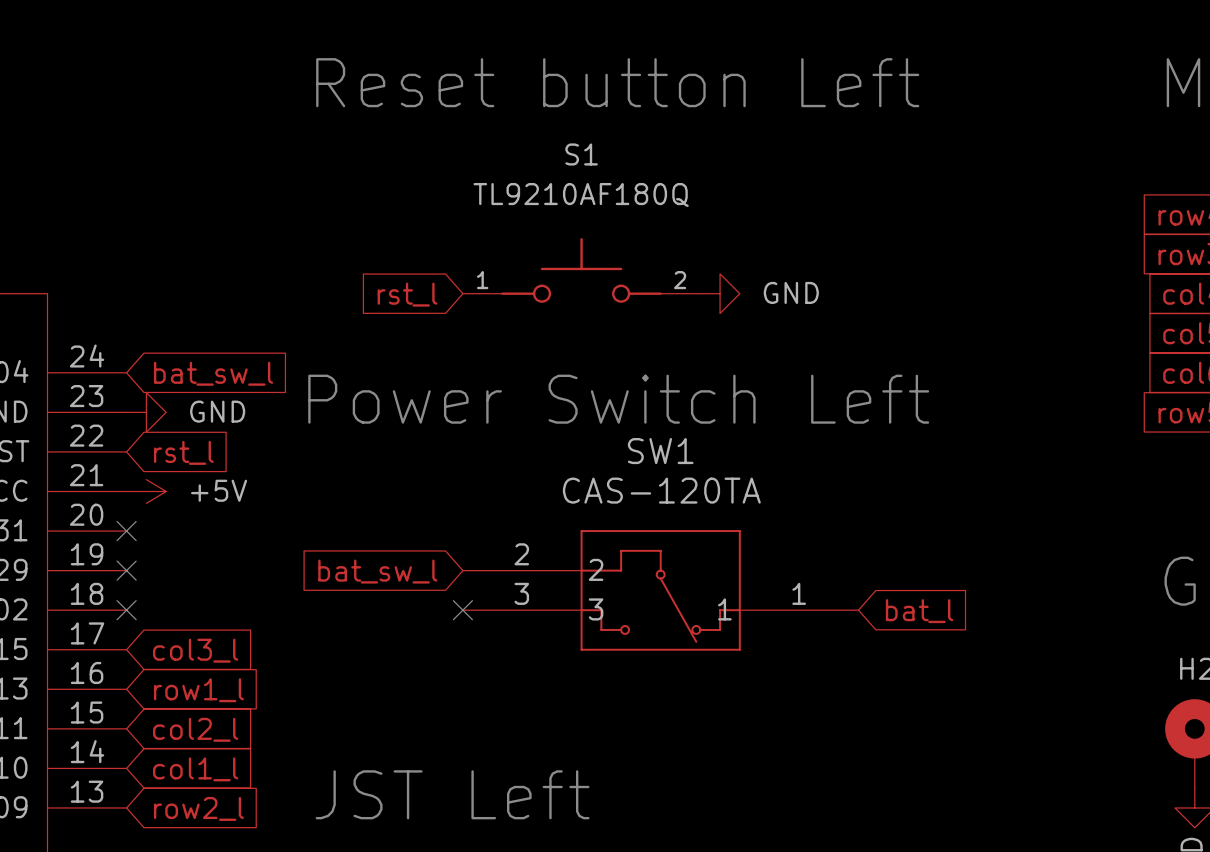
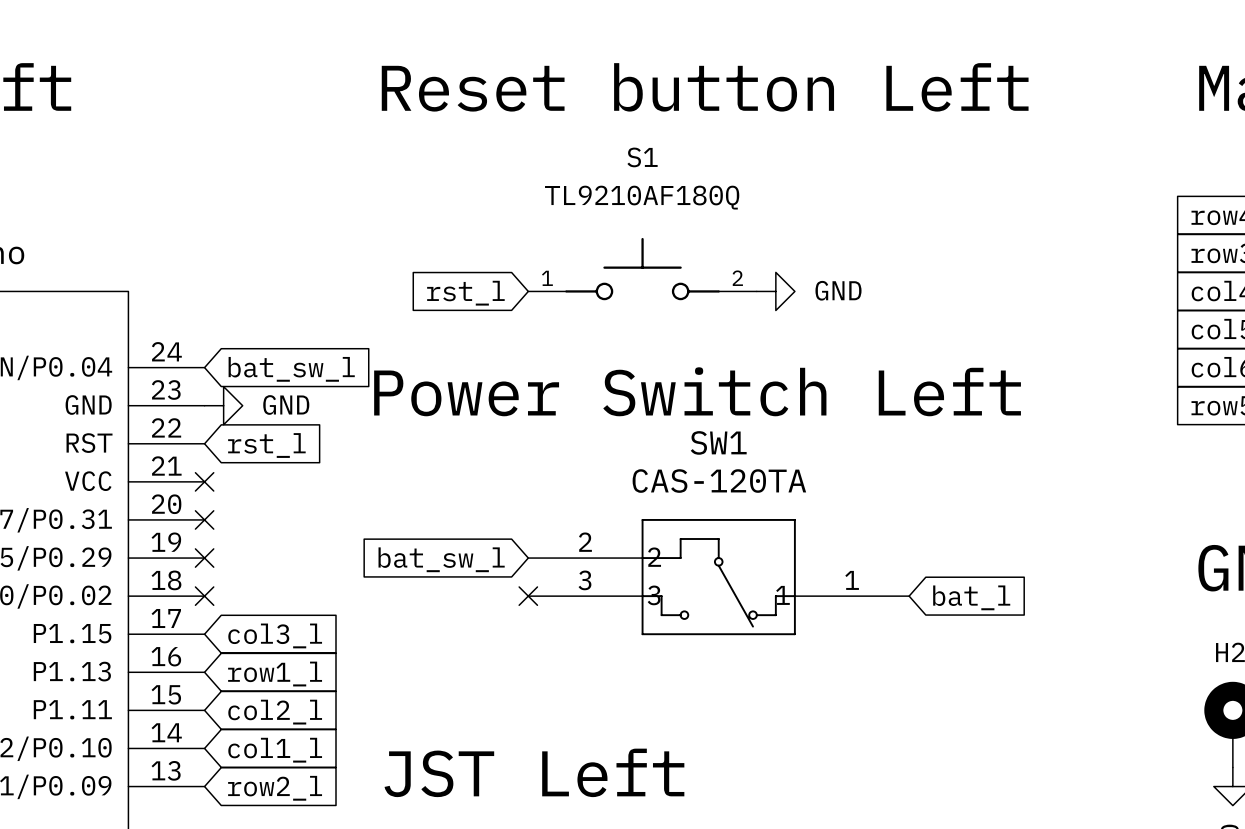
no-connect mark: none -> (204, 481)
power symbol: +5V (146, 491) -> none

